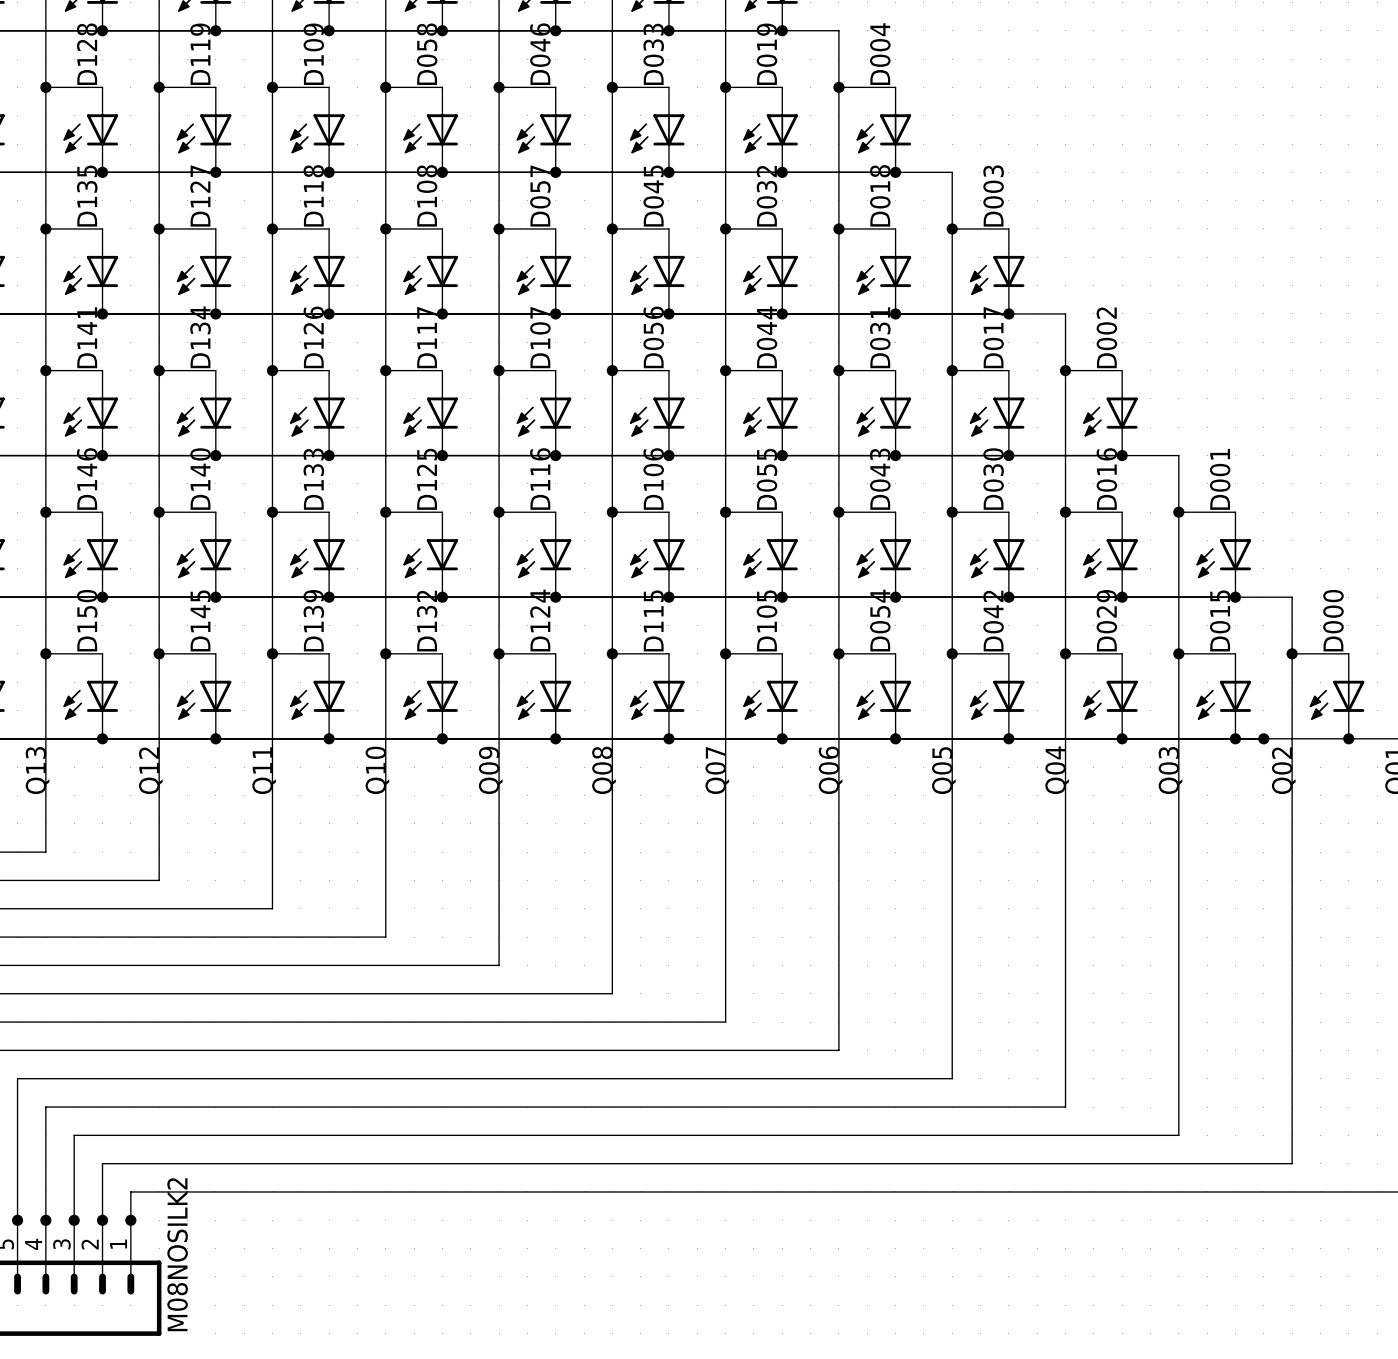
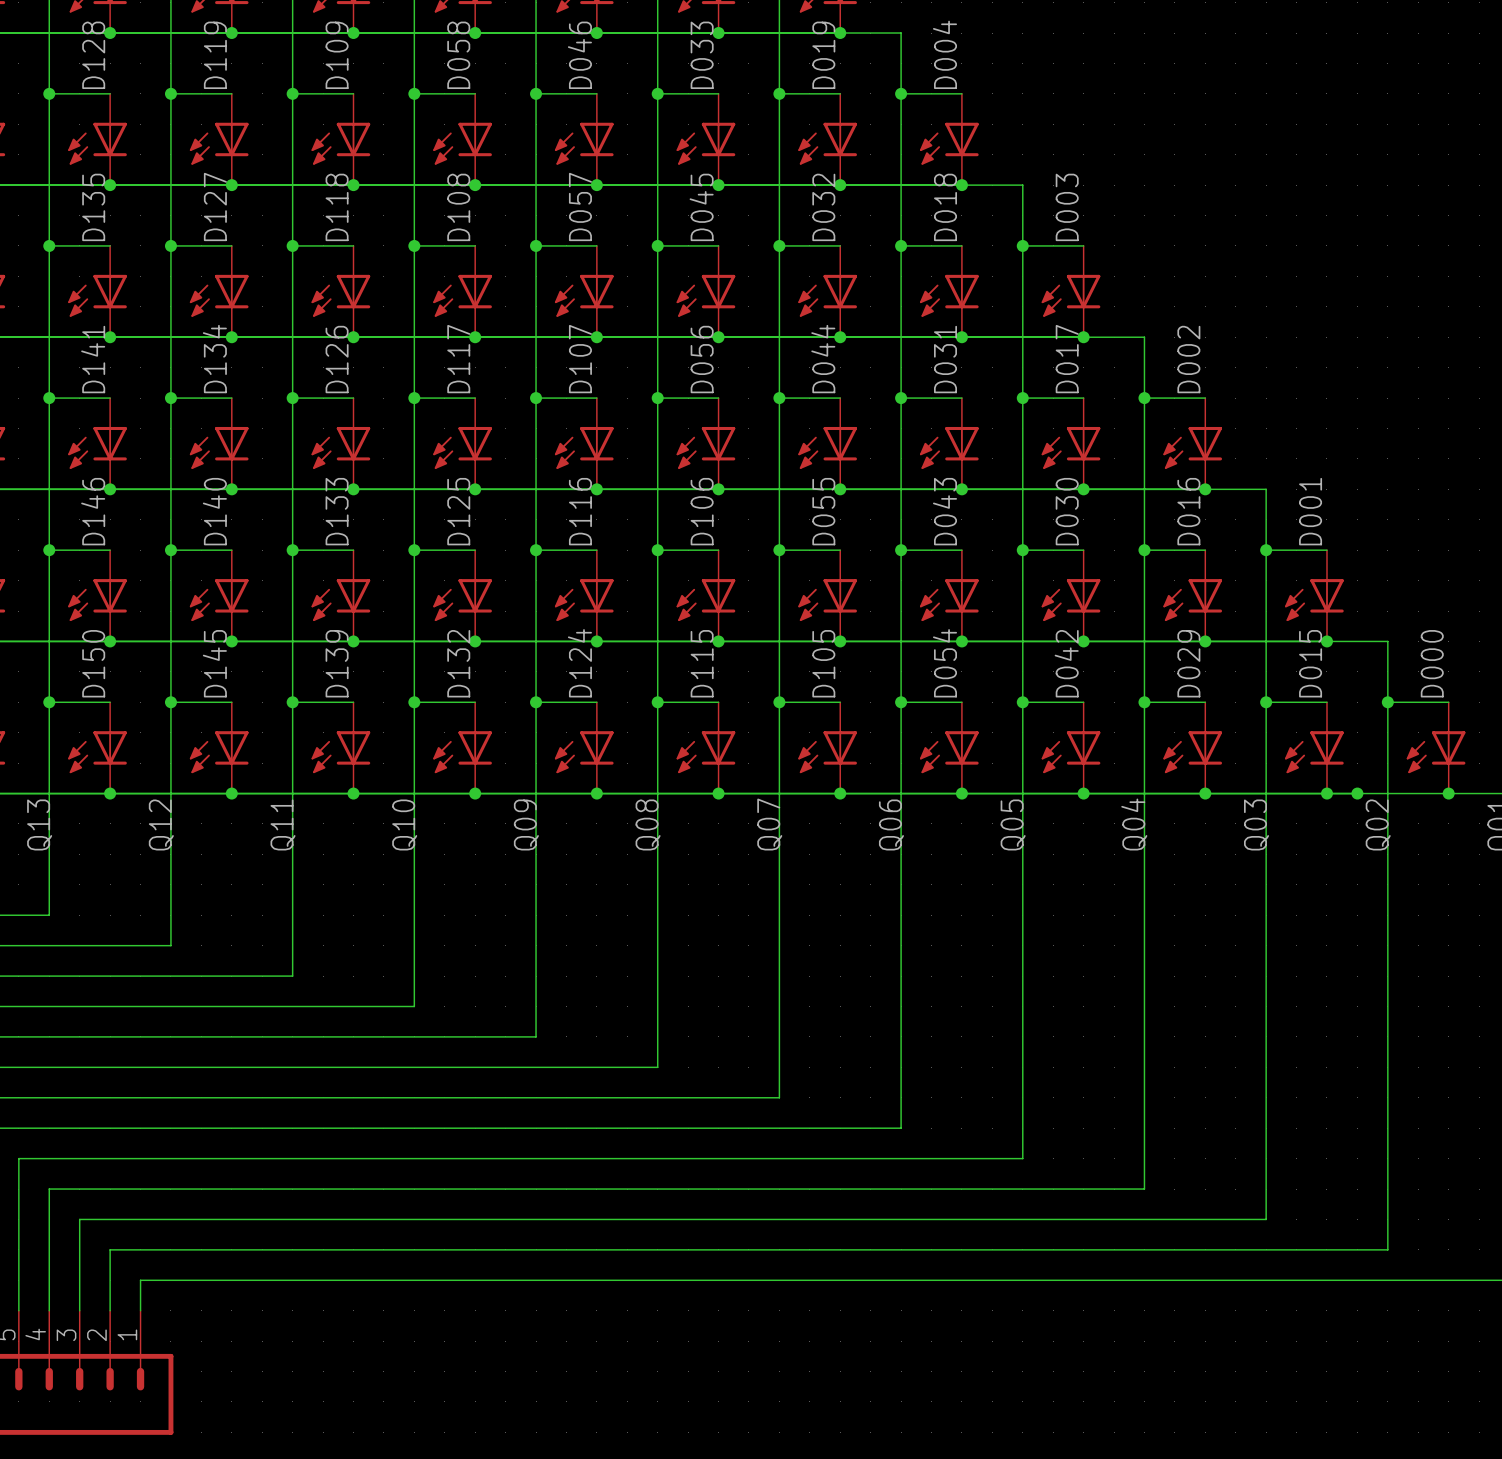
junction: (17, 1220) -> none
junction: (45, 1220) -> none
junction: (74, 1220) -> none
junction: (102, 1220) -> none
junction: (130, 1220) -> none
part value: M08NOSILK2 (177, 1254) -> none

